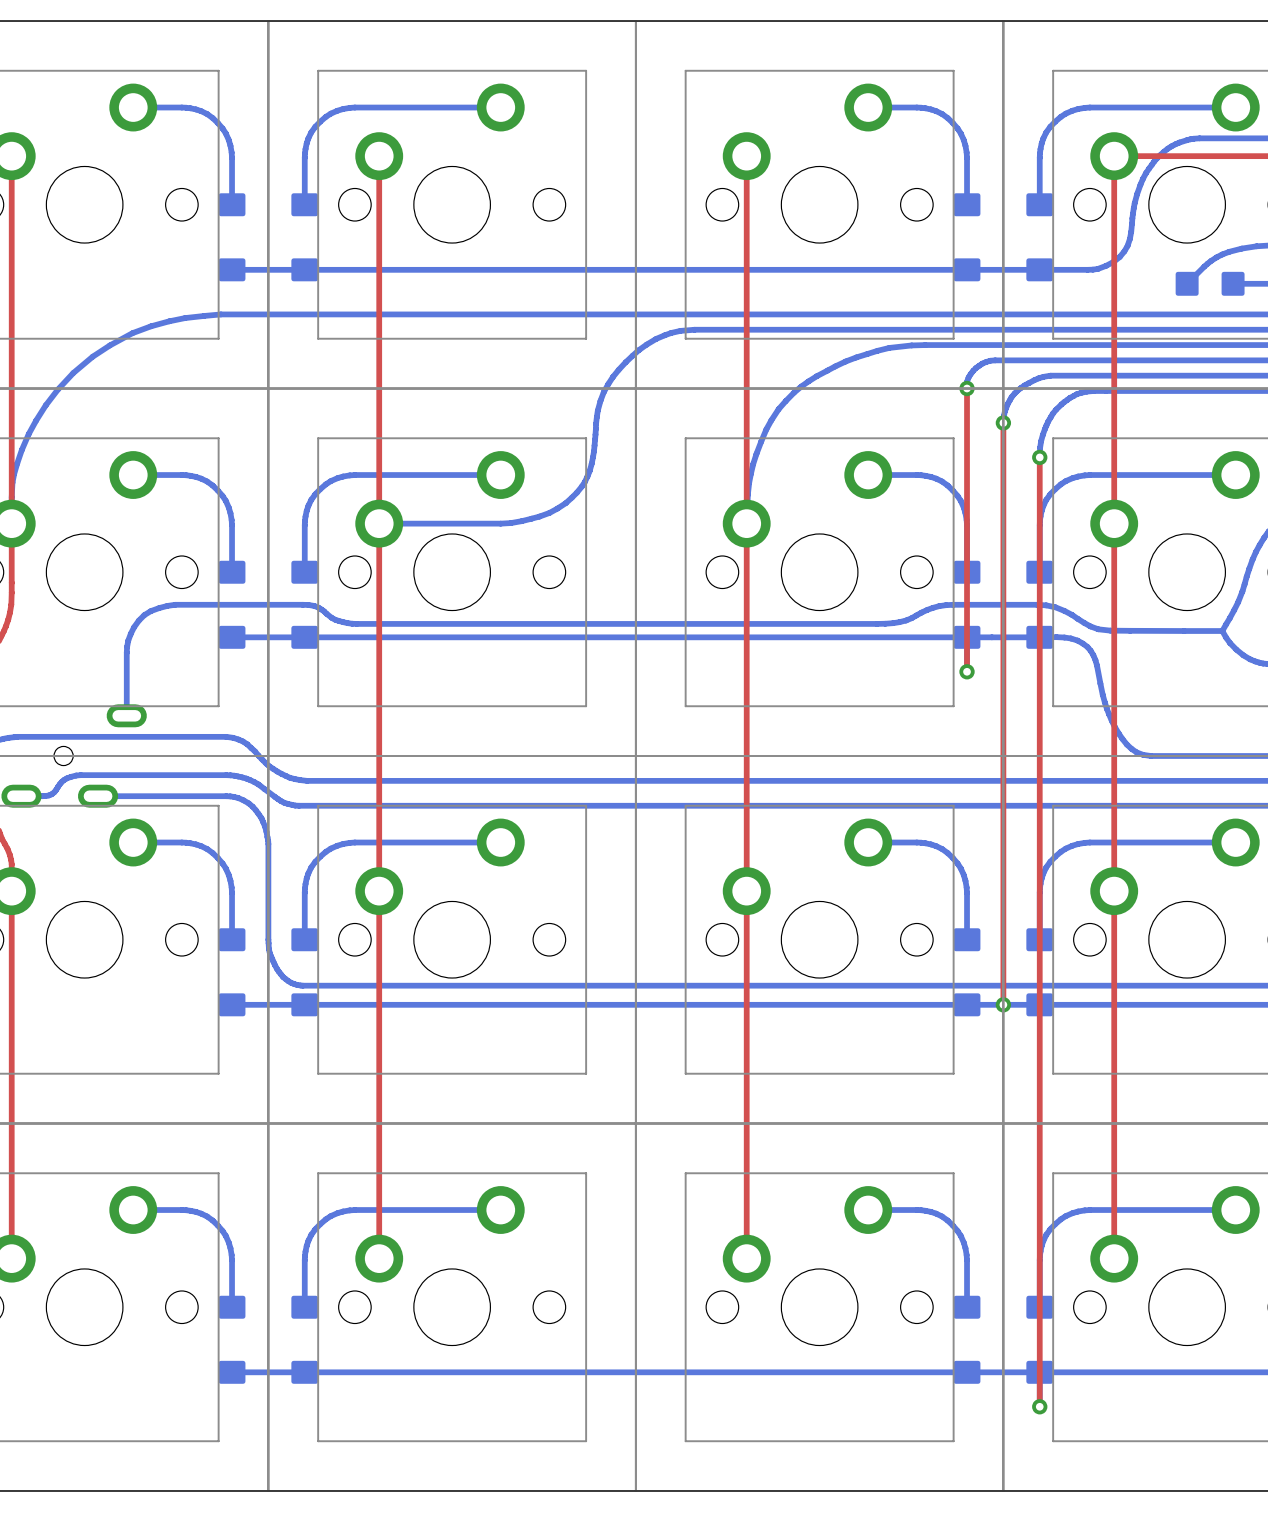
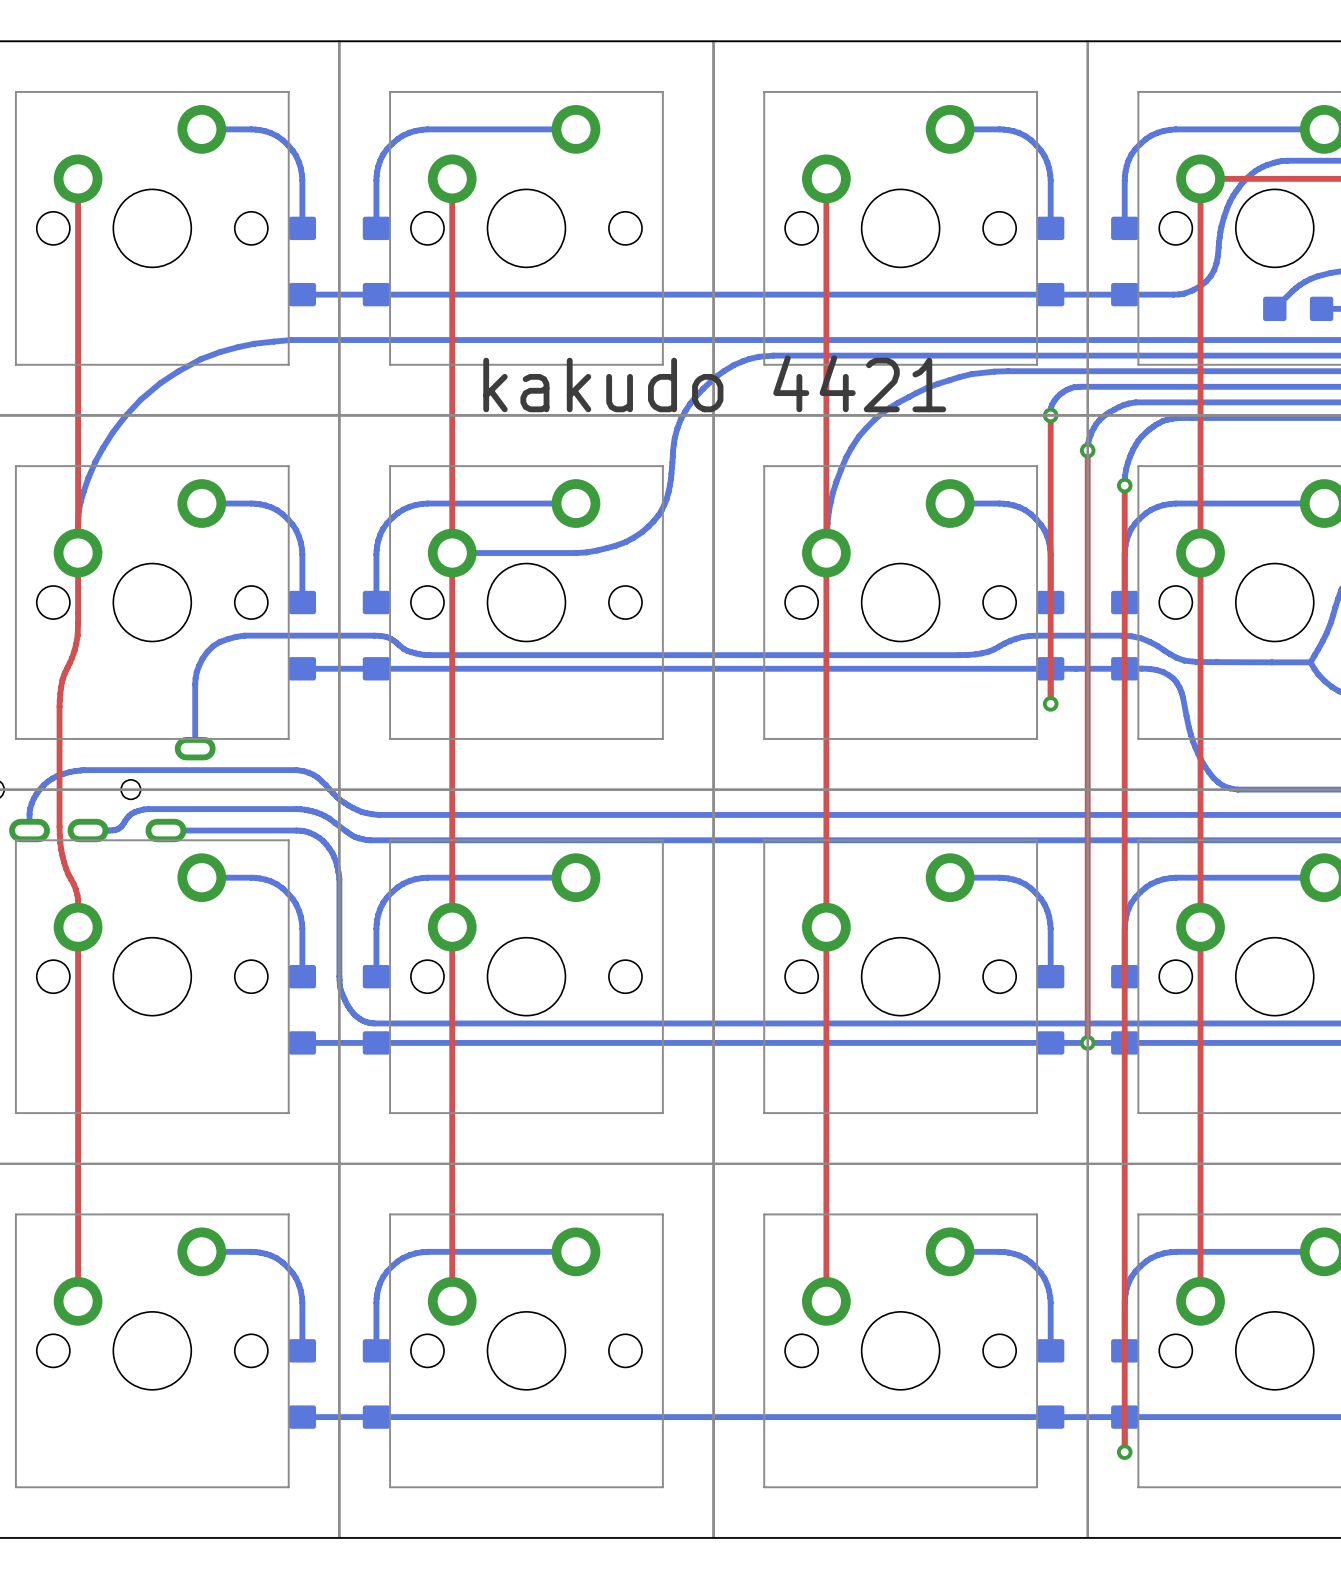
text: none -> kakudo 4421 (714, 383)

